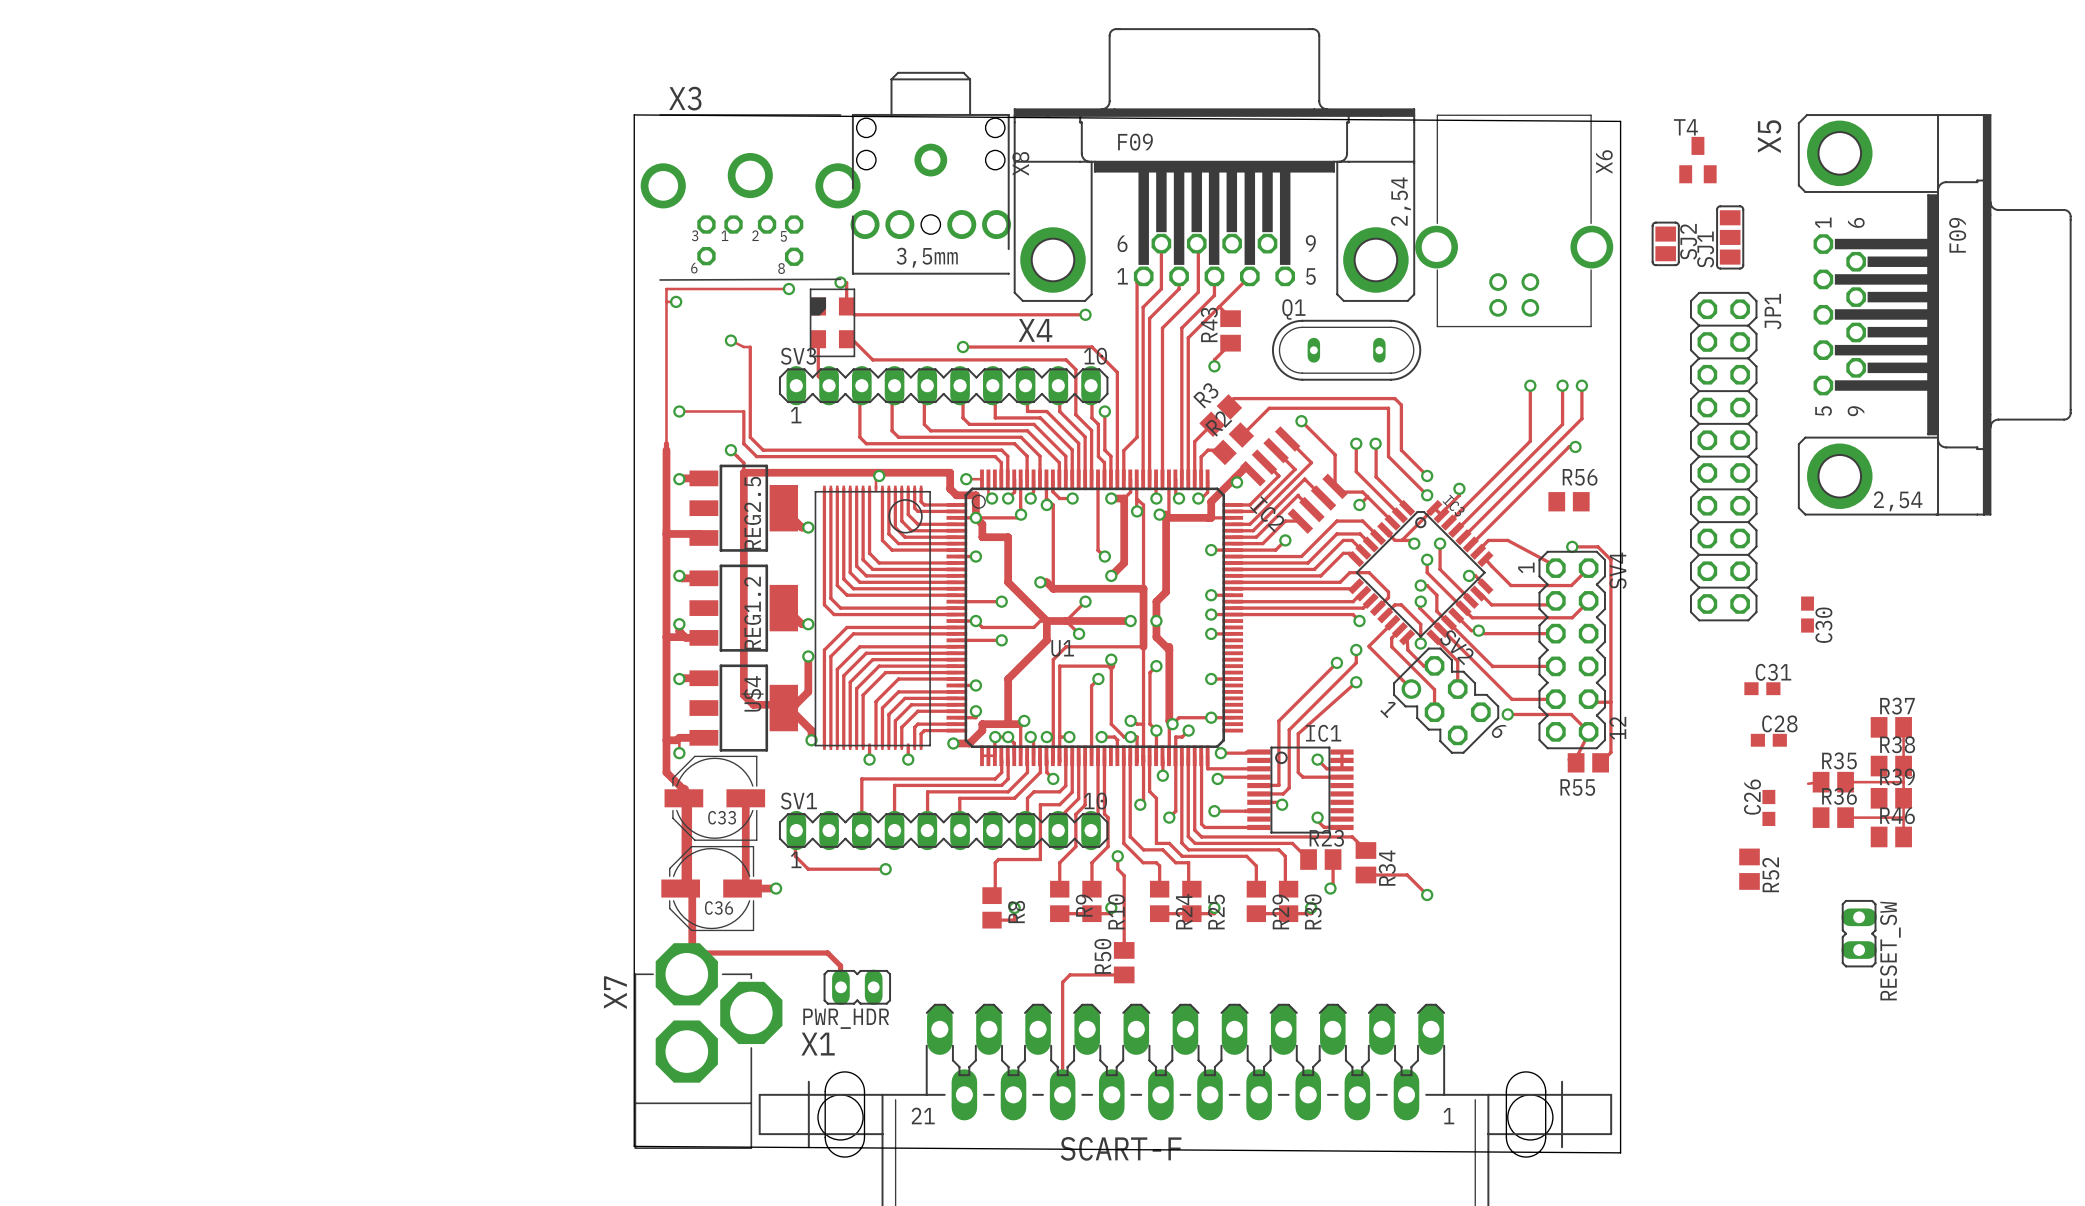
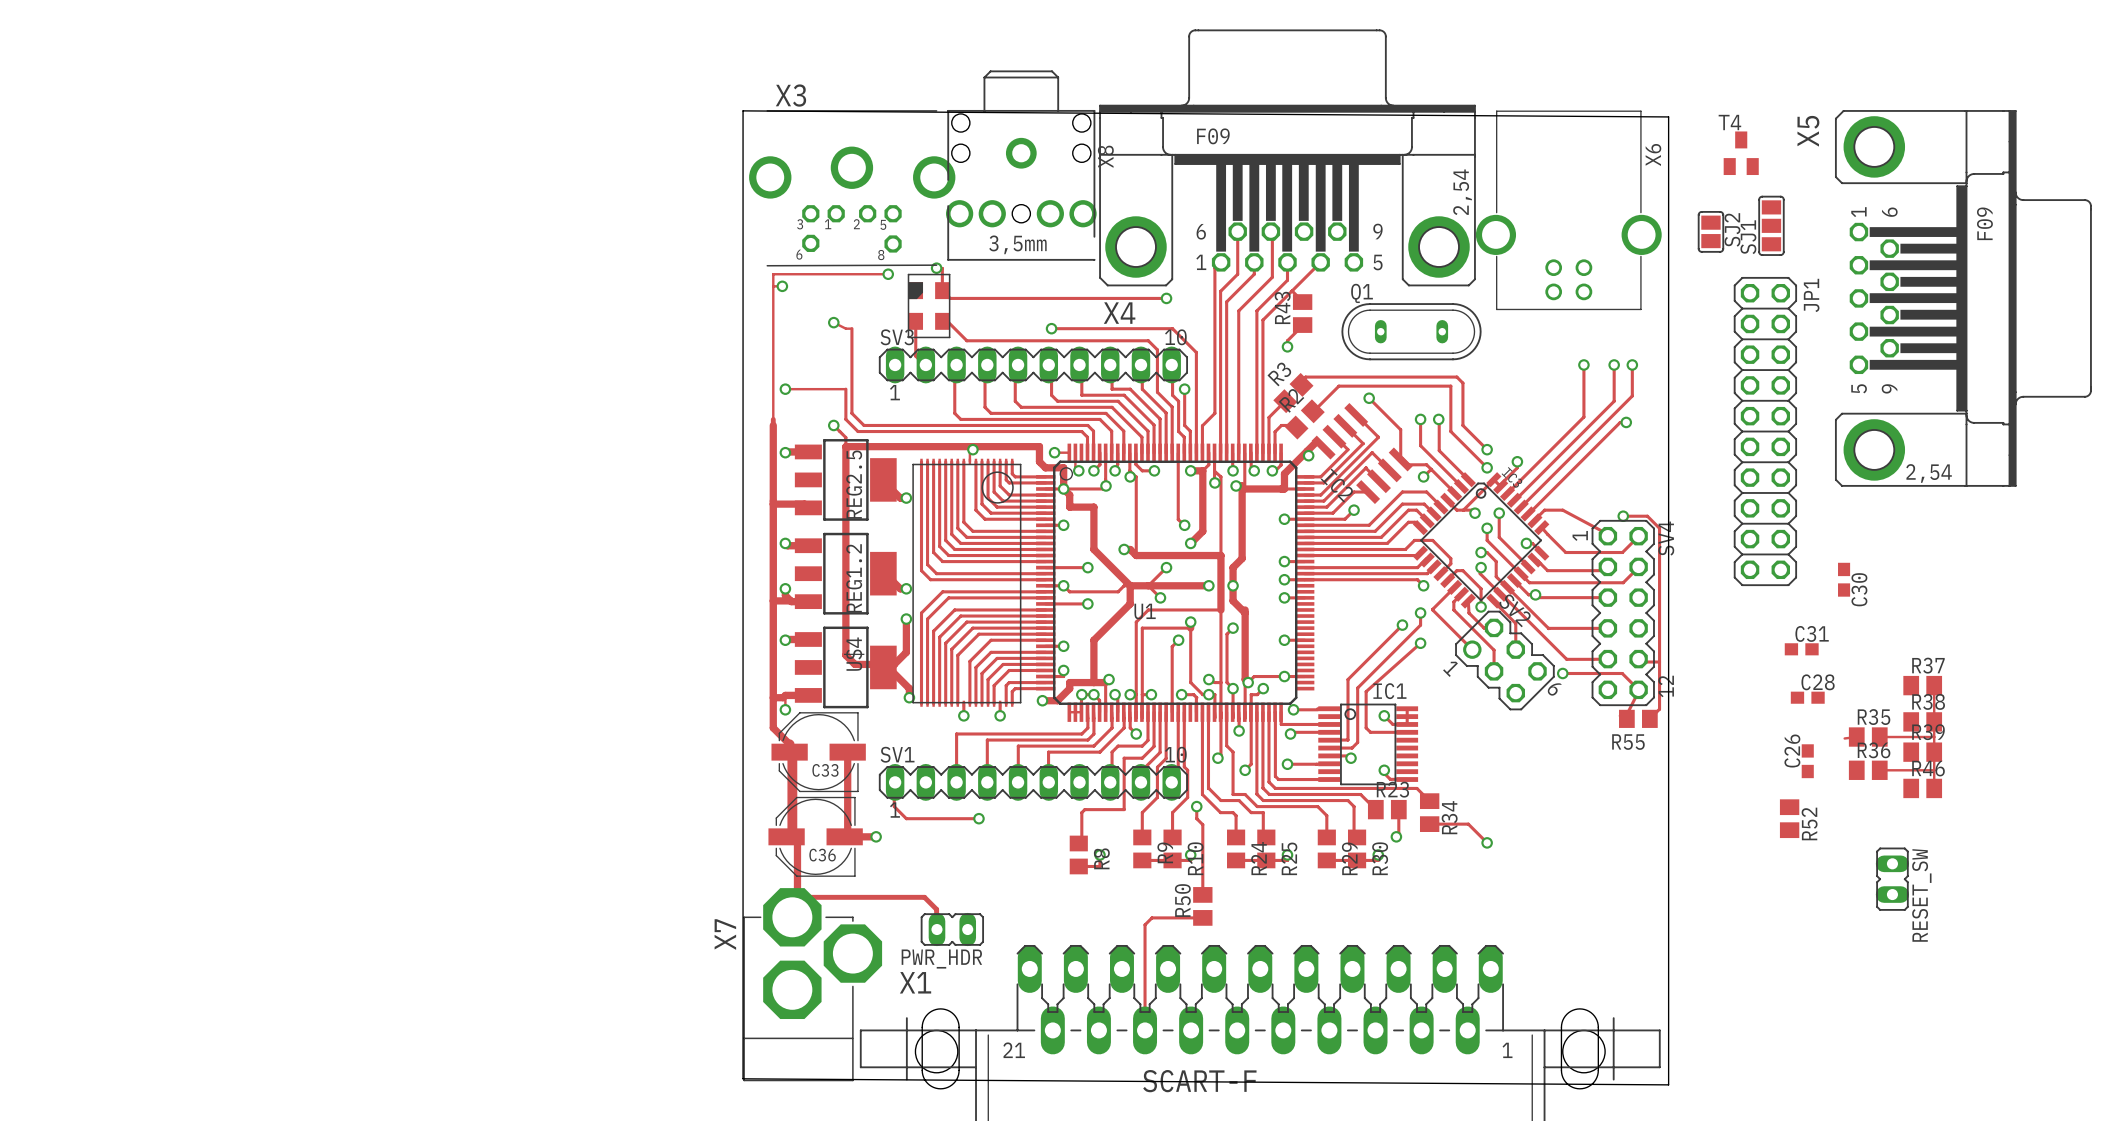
R56: (1569, 501) -> none

